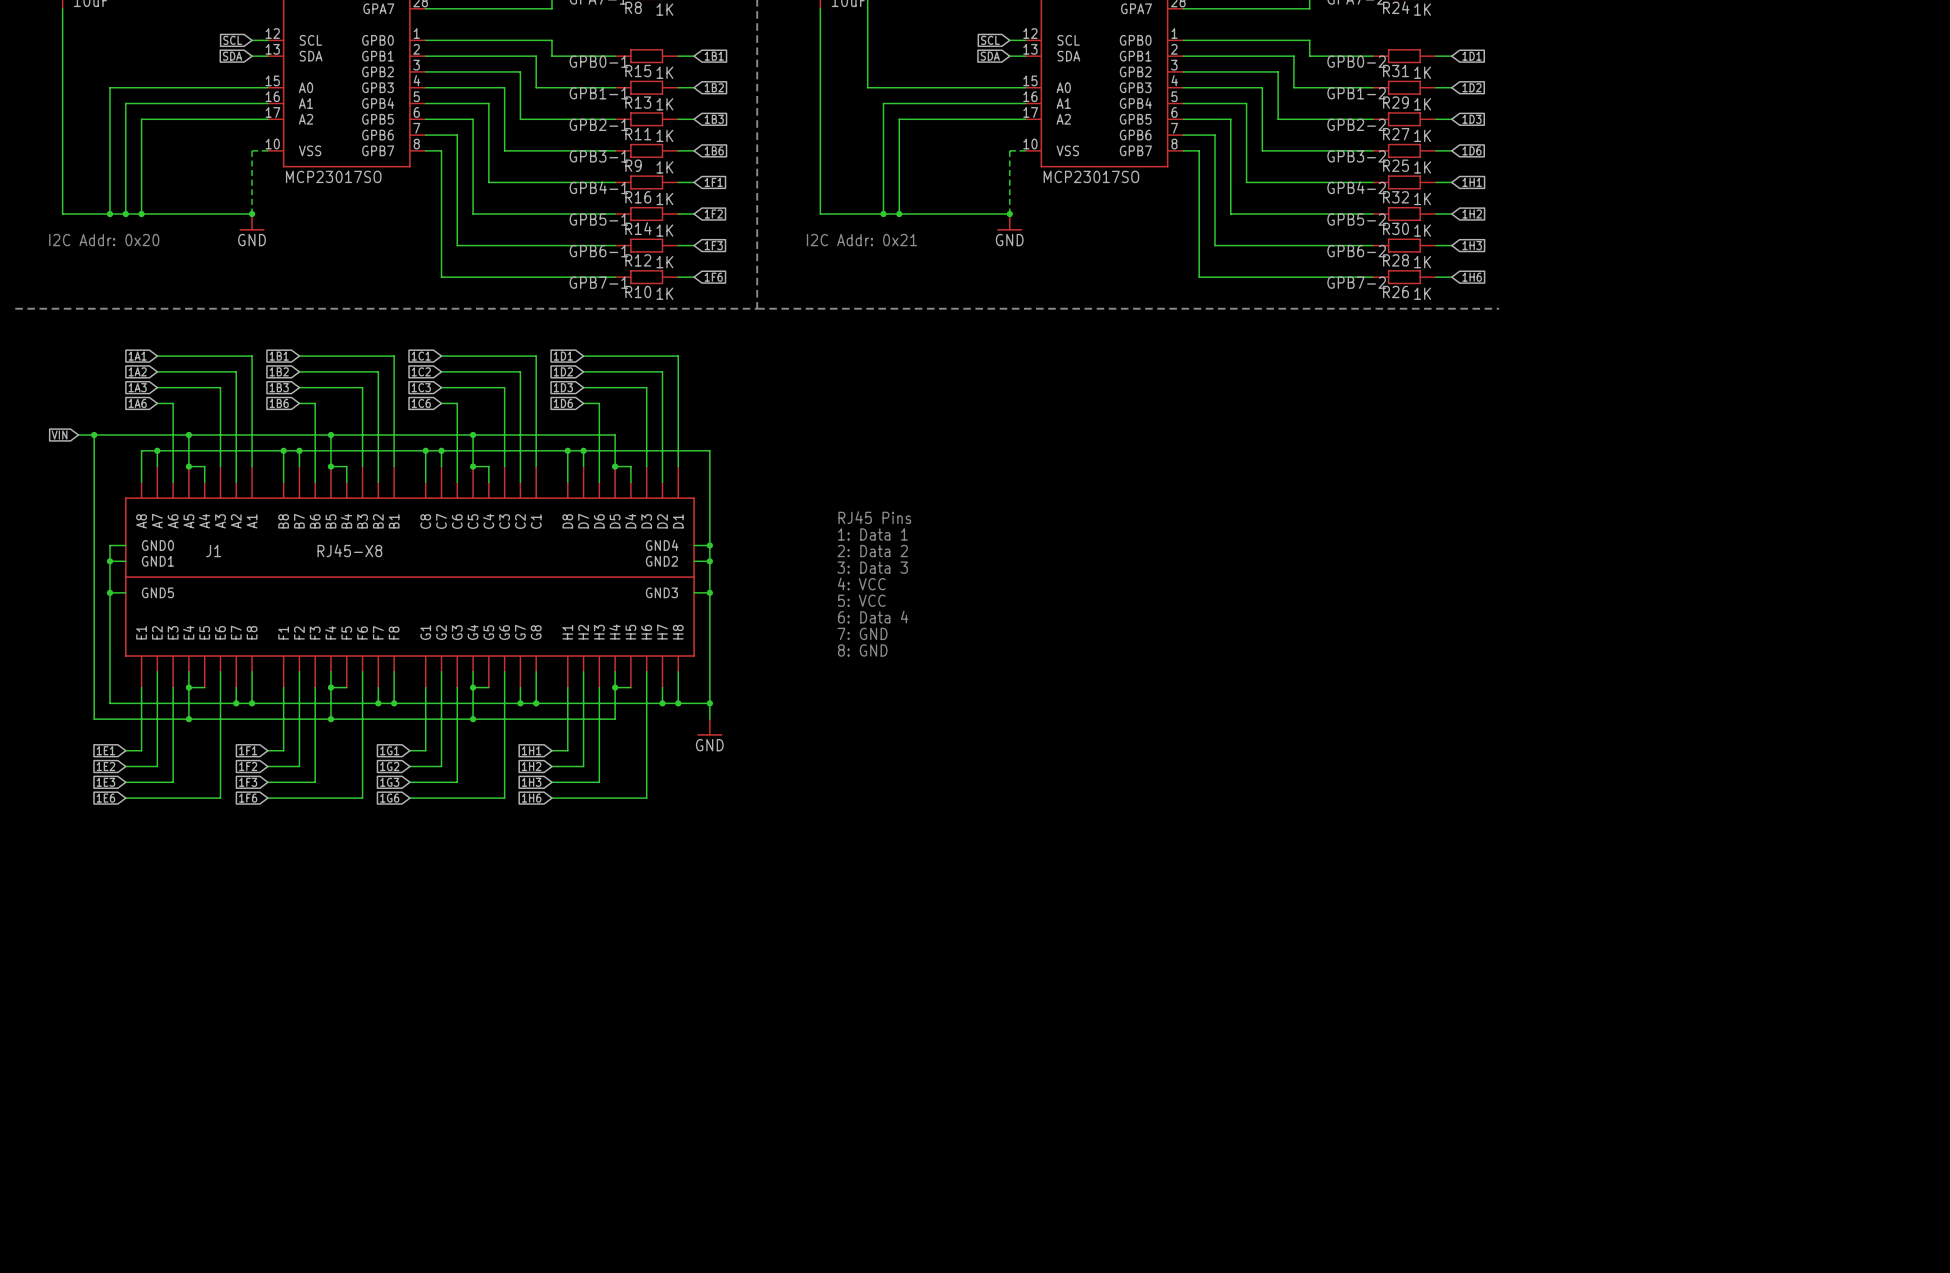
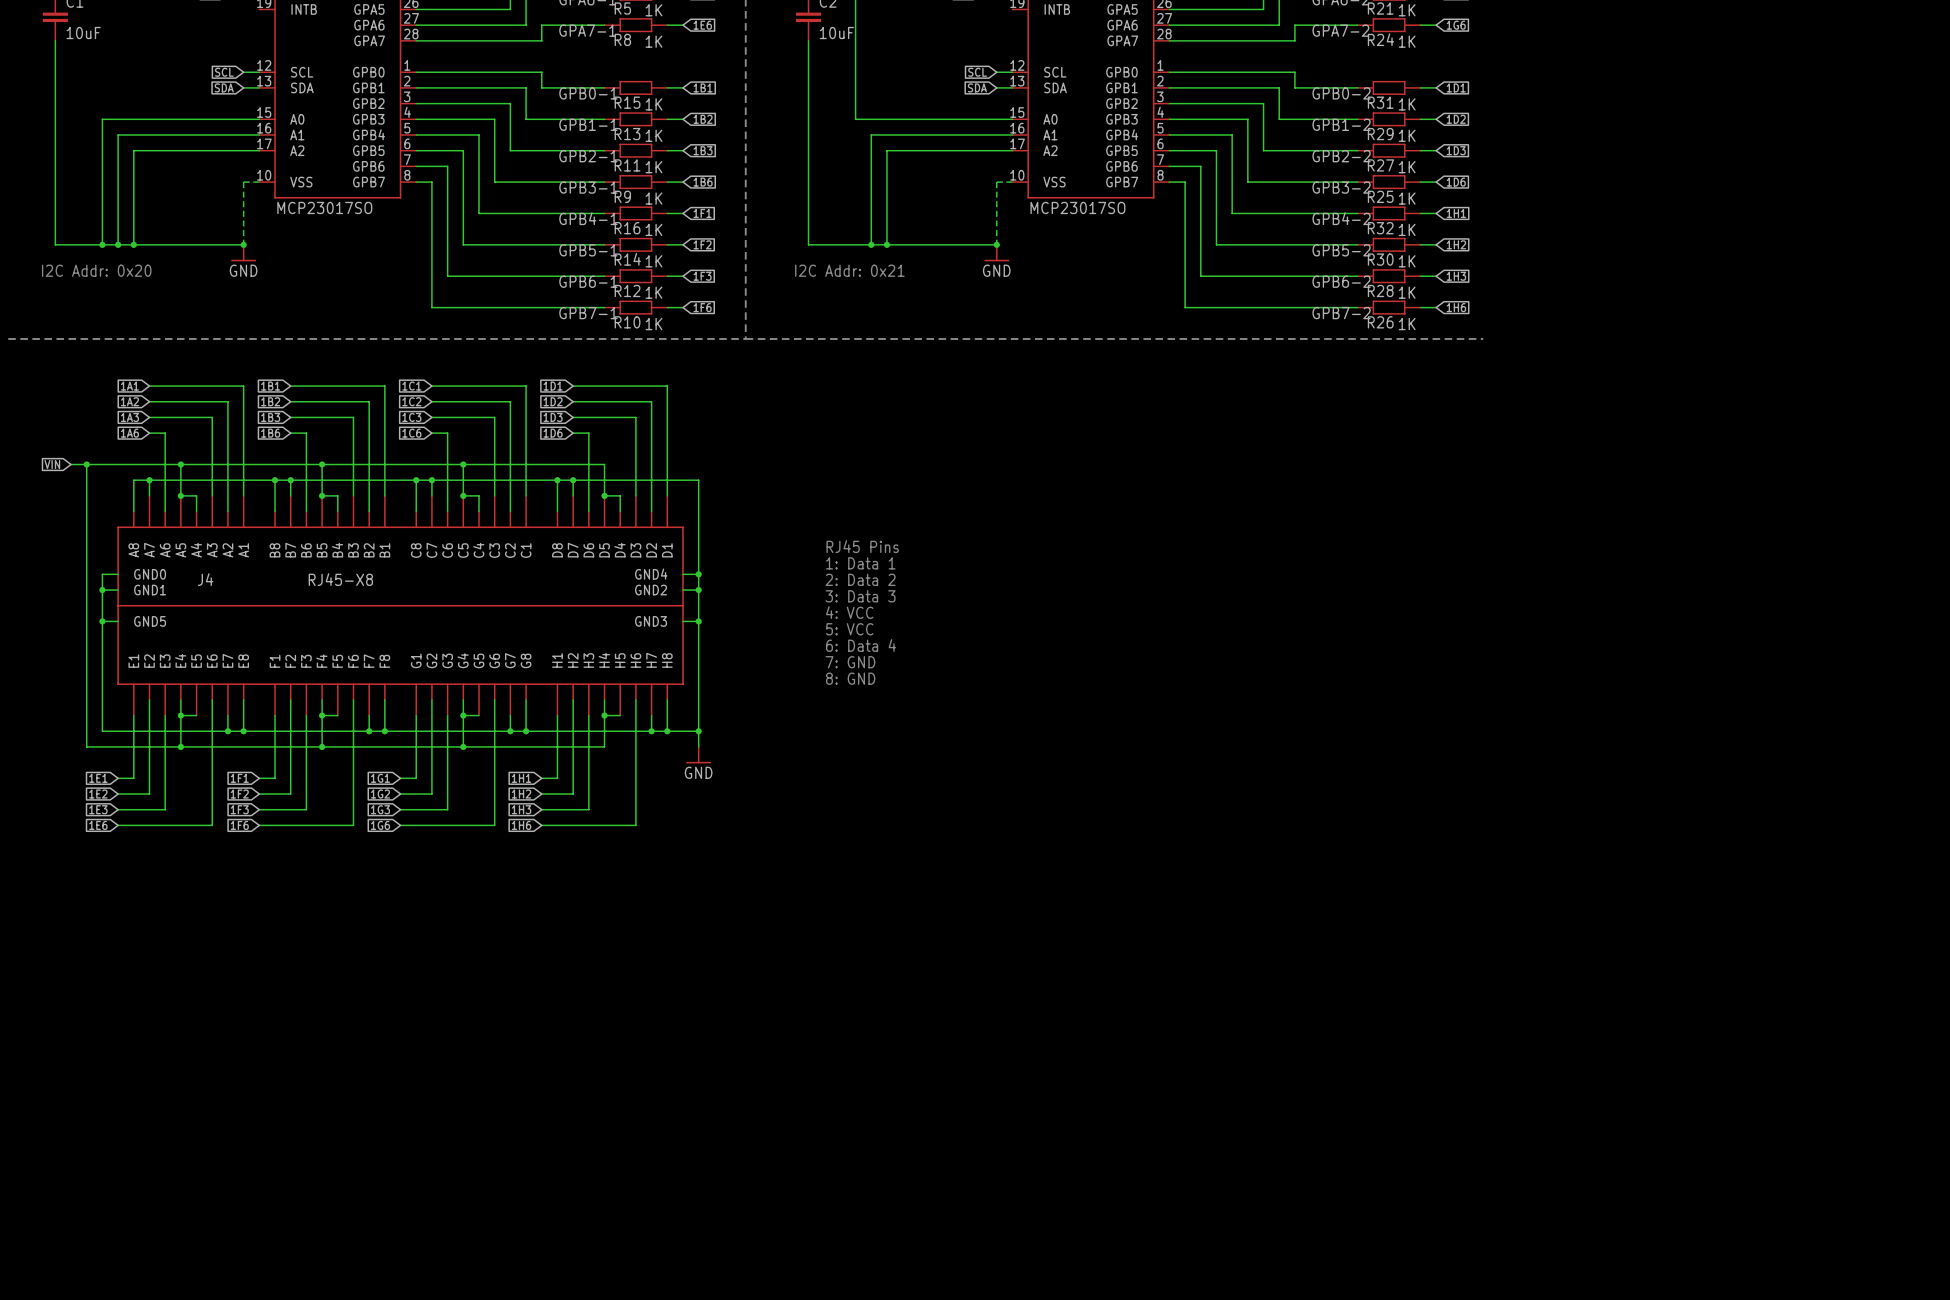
J1 name: J1 (213, 551) -> J4 (205, 579)

